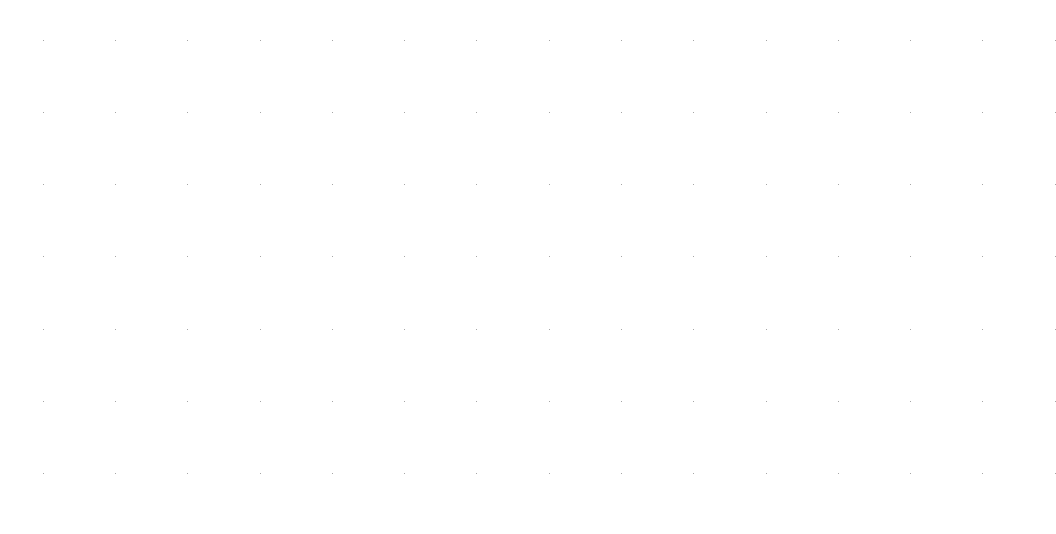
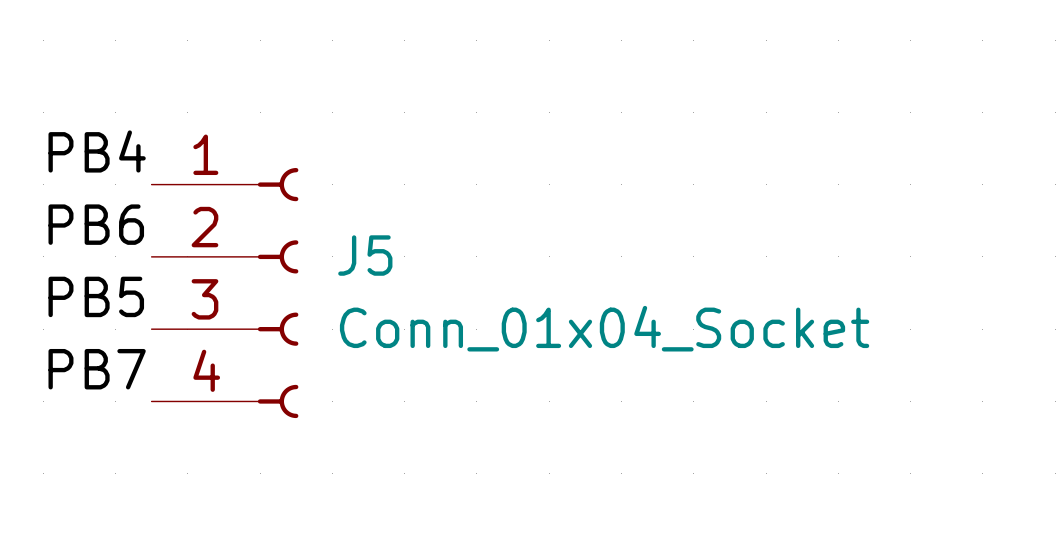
label: none -> PB4 (97, 151)
label: none -> PB6 (96, 224)
J5: none -> Conn_01x04_Socket (224, 293)
label: none -> PB5 (96, 296)
label: none -> PB7 (97, 369)

